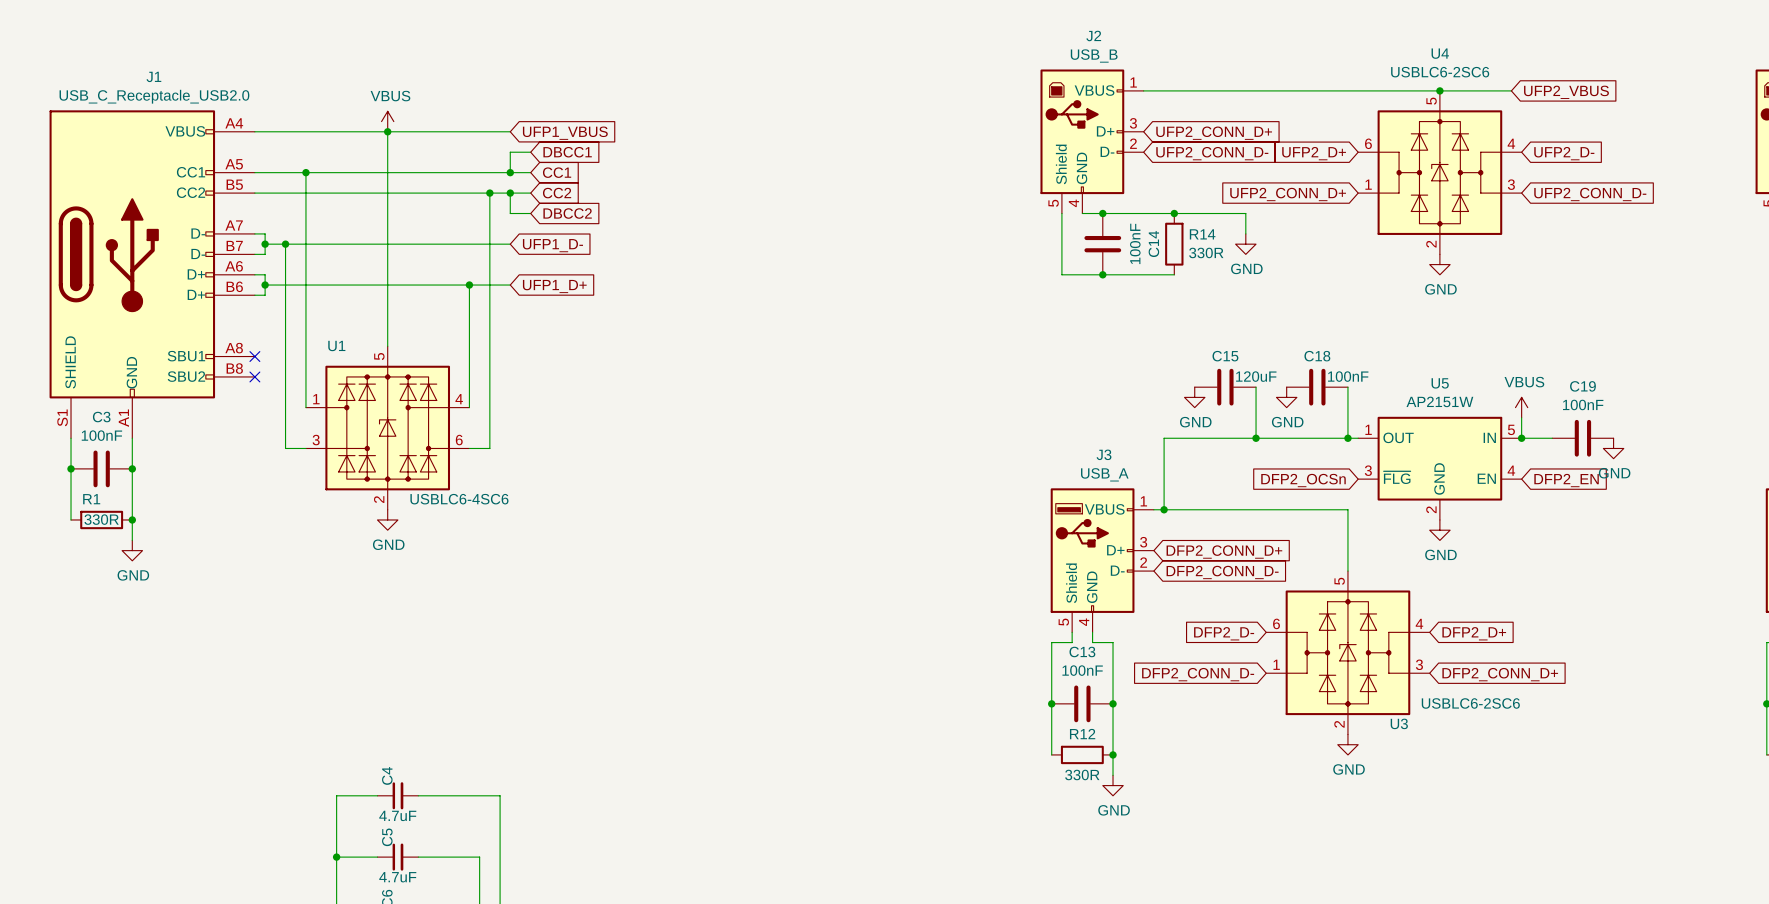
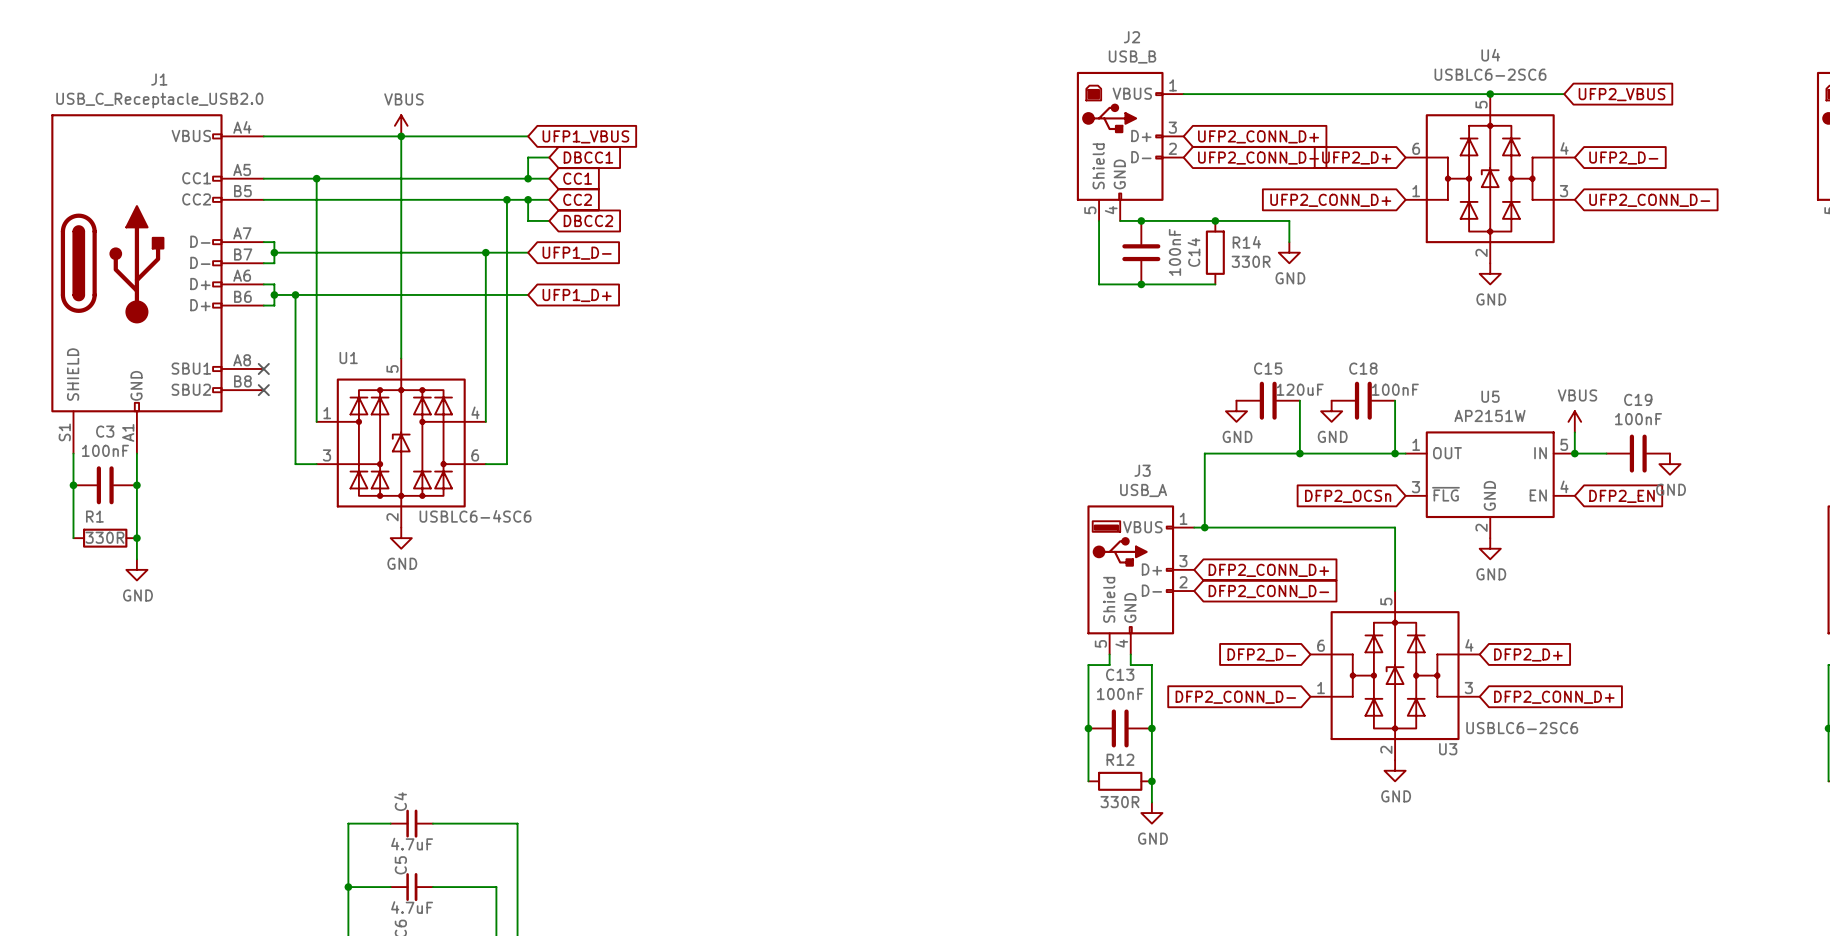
wire: (285, 244) (285, 285) -> (485, 252) (485, 294)
junction position: (285, 244) -> (295, 294)
junction position: (469, 285) -> (485, 252)

